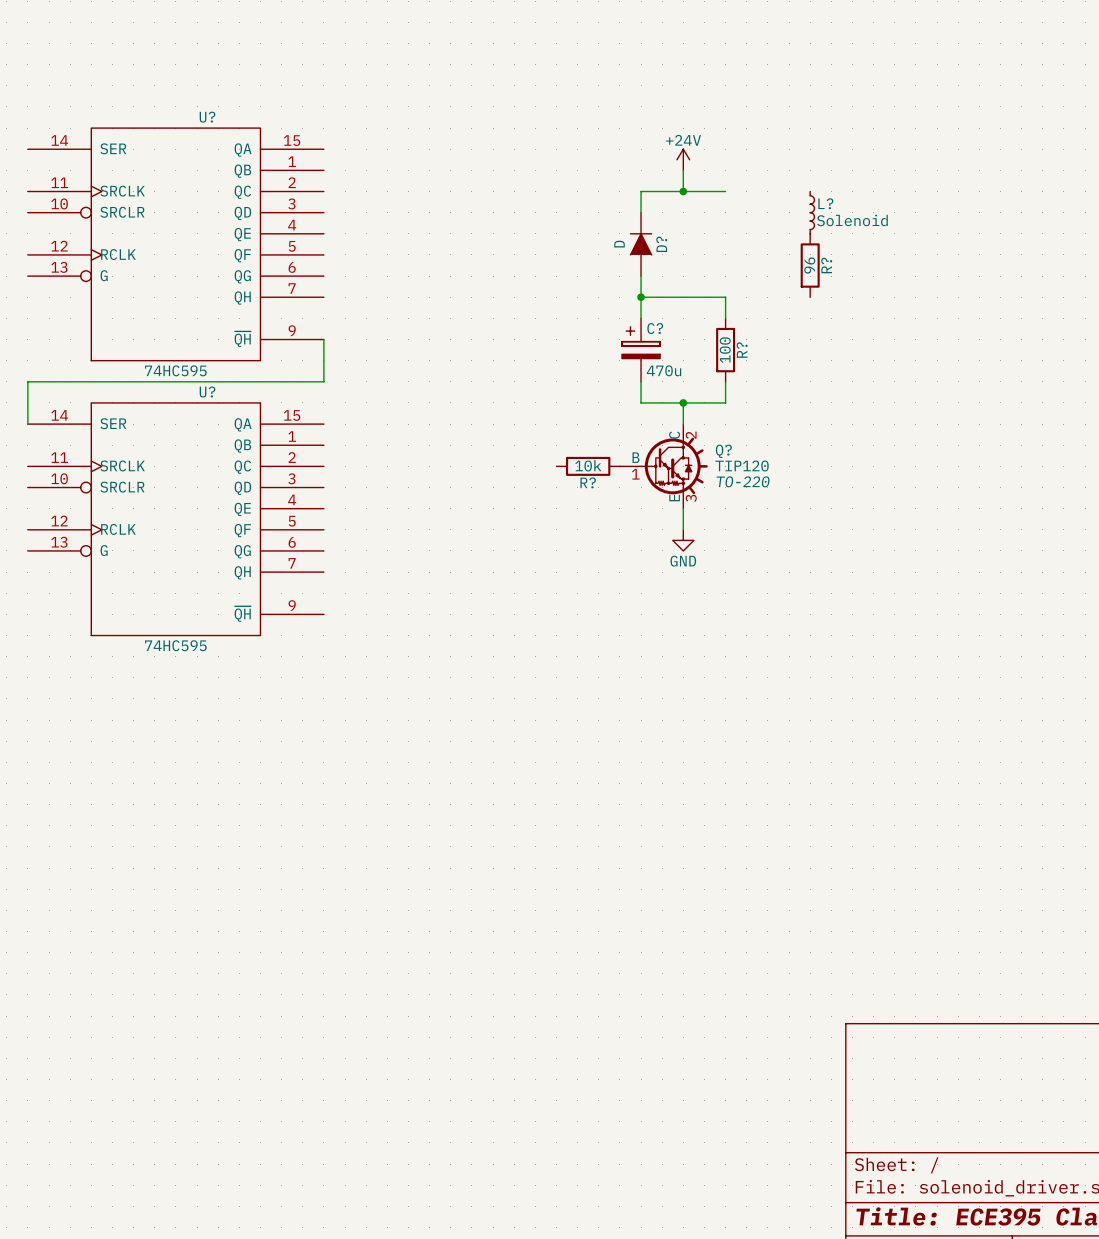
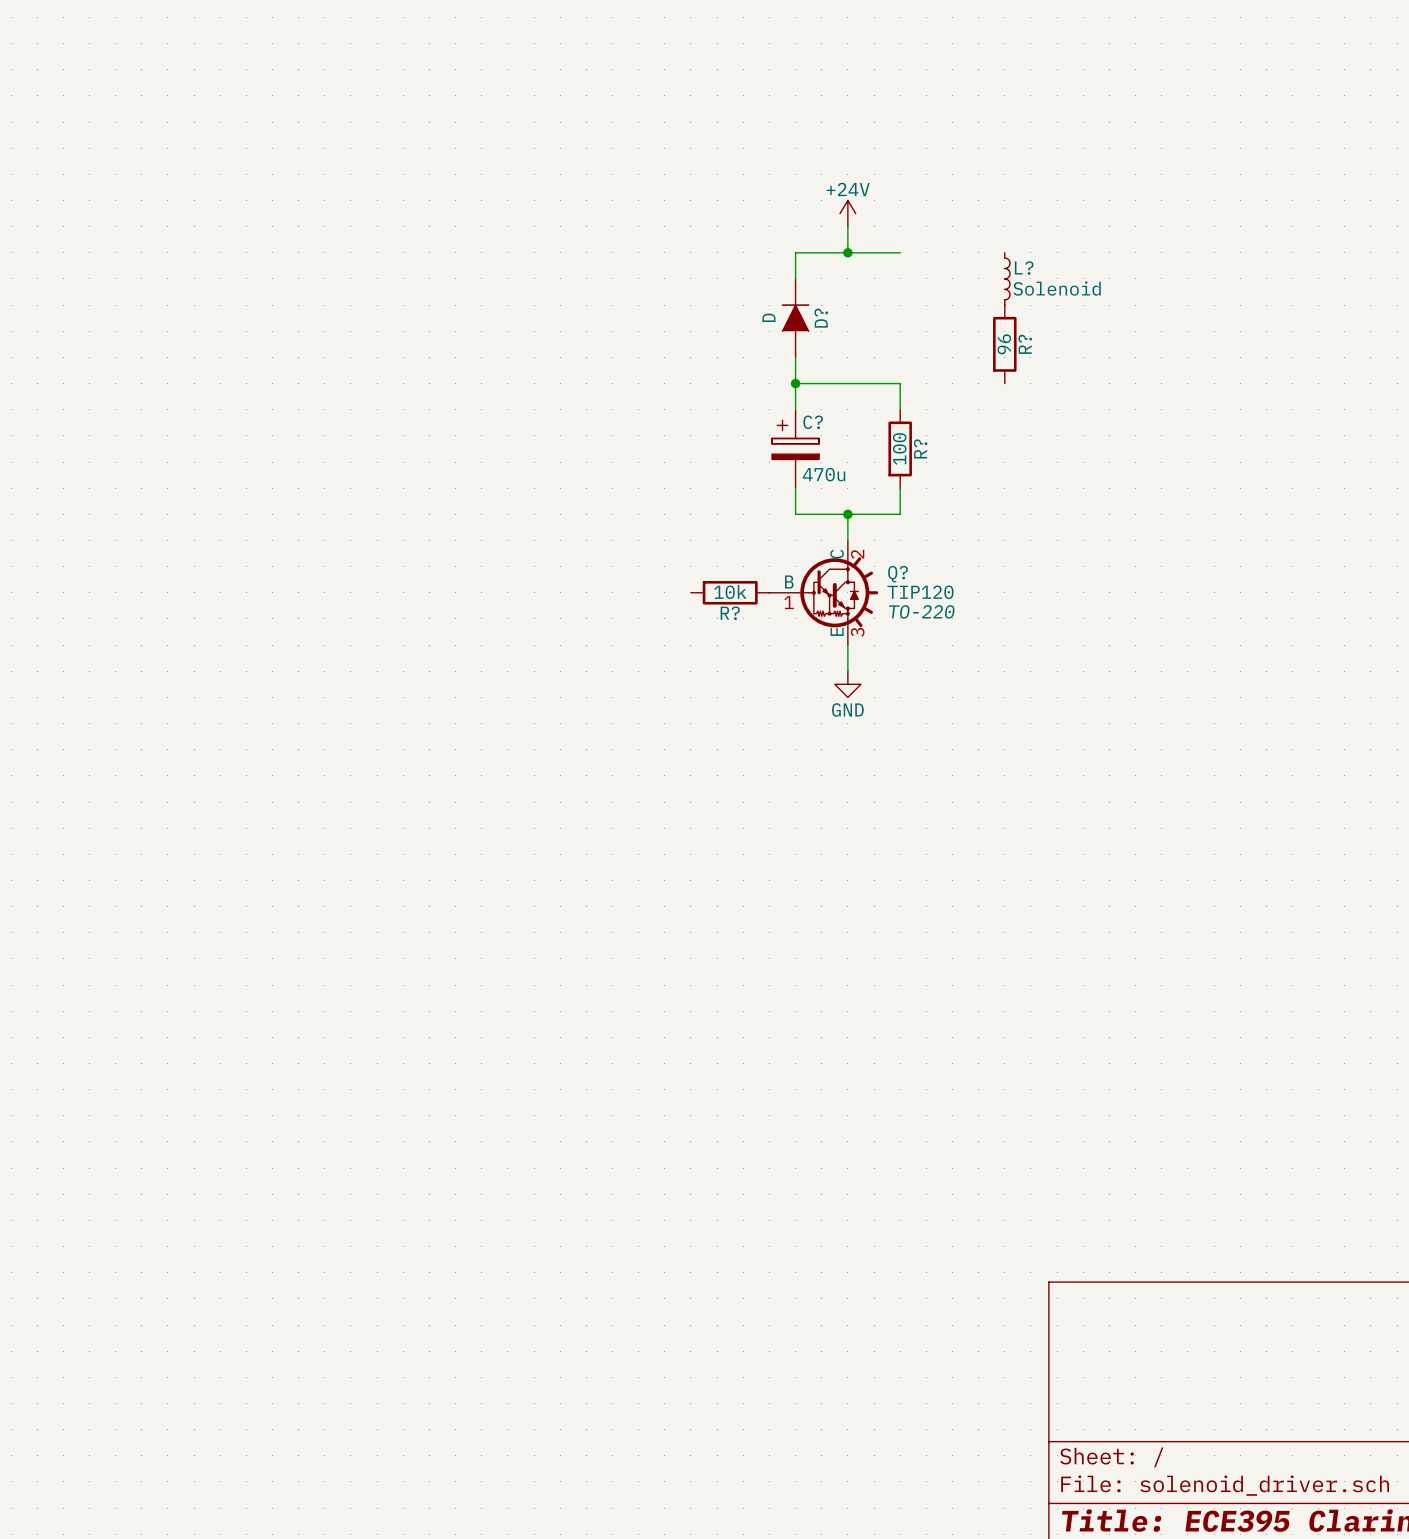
U?: 74HC595 (175, 244) -> none
wire: (323, 339) (323, 381) (27, 381) (27, 424) -> none
U?: 74HC595 (175, 519) -> none

